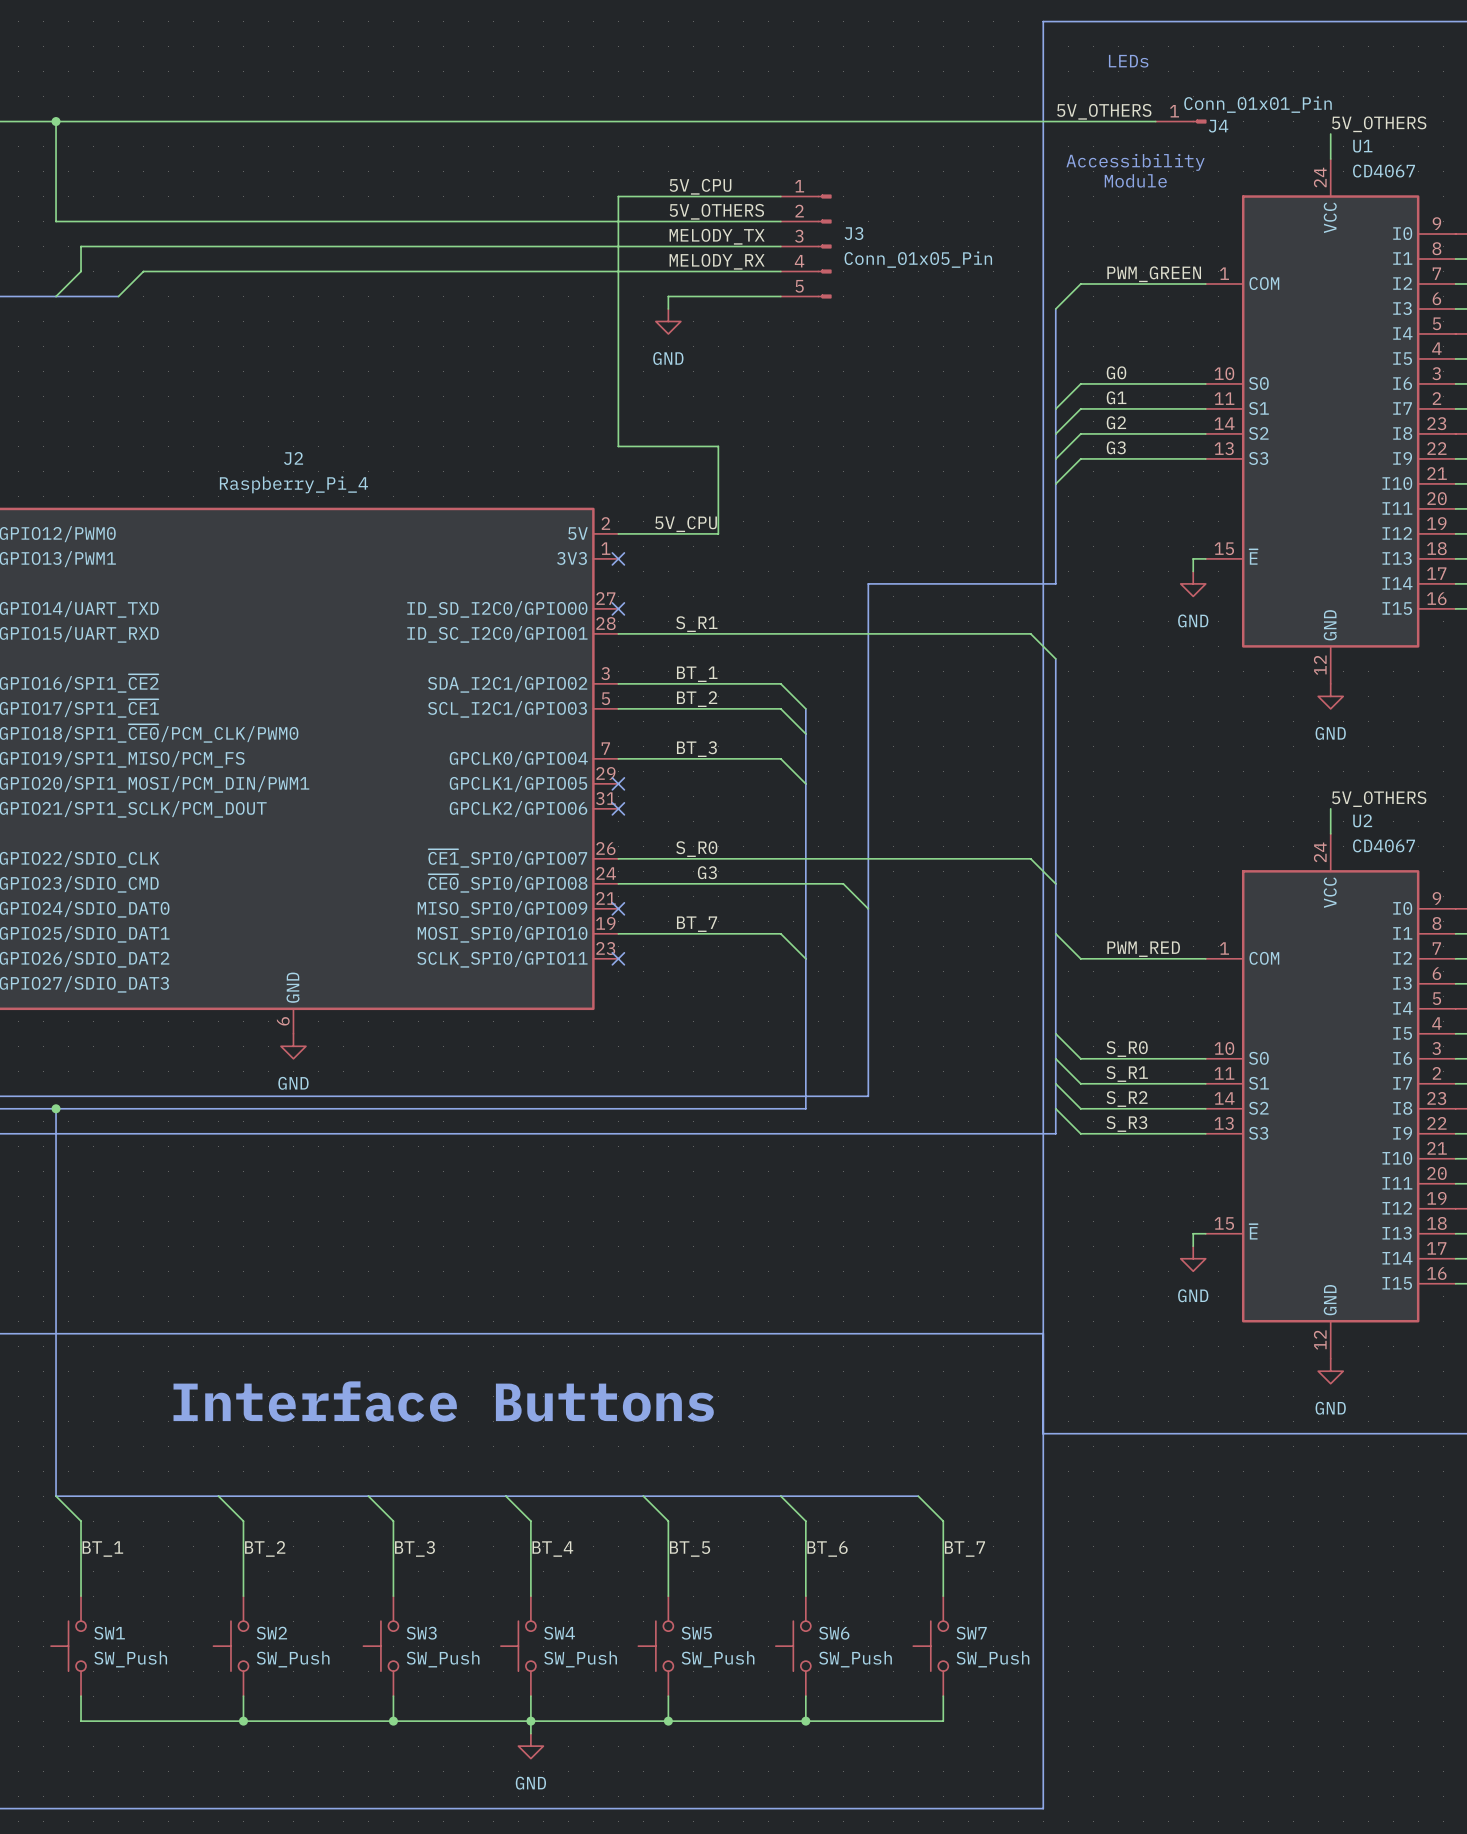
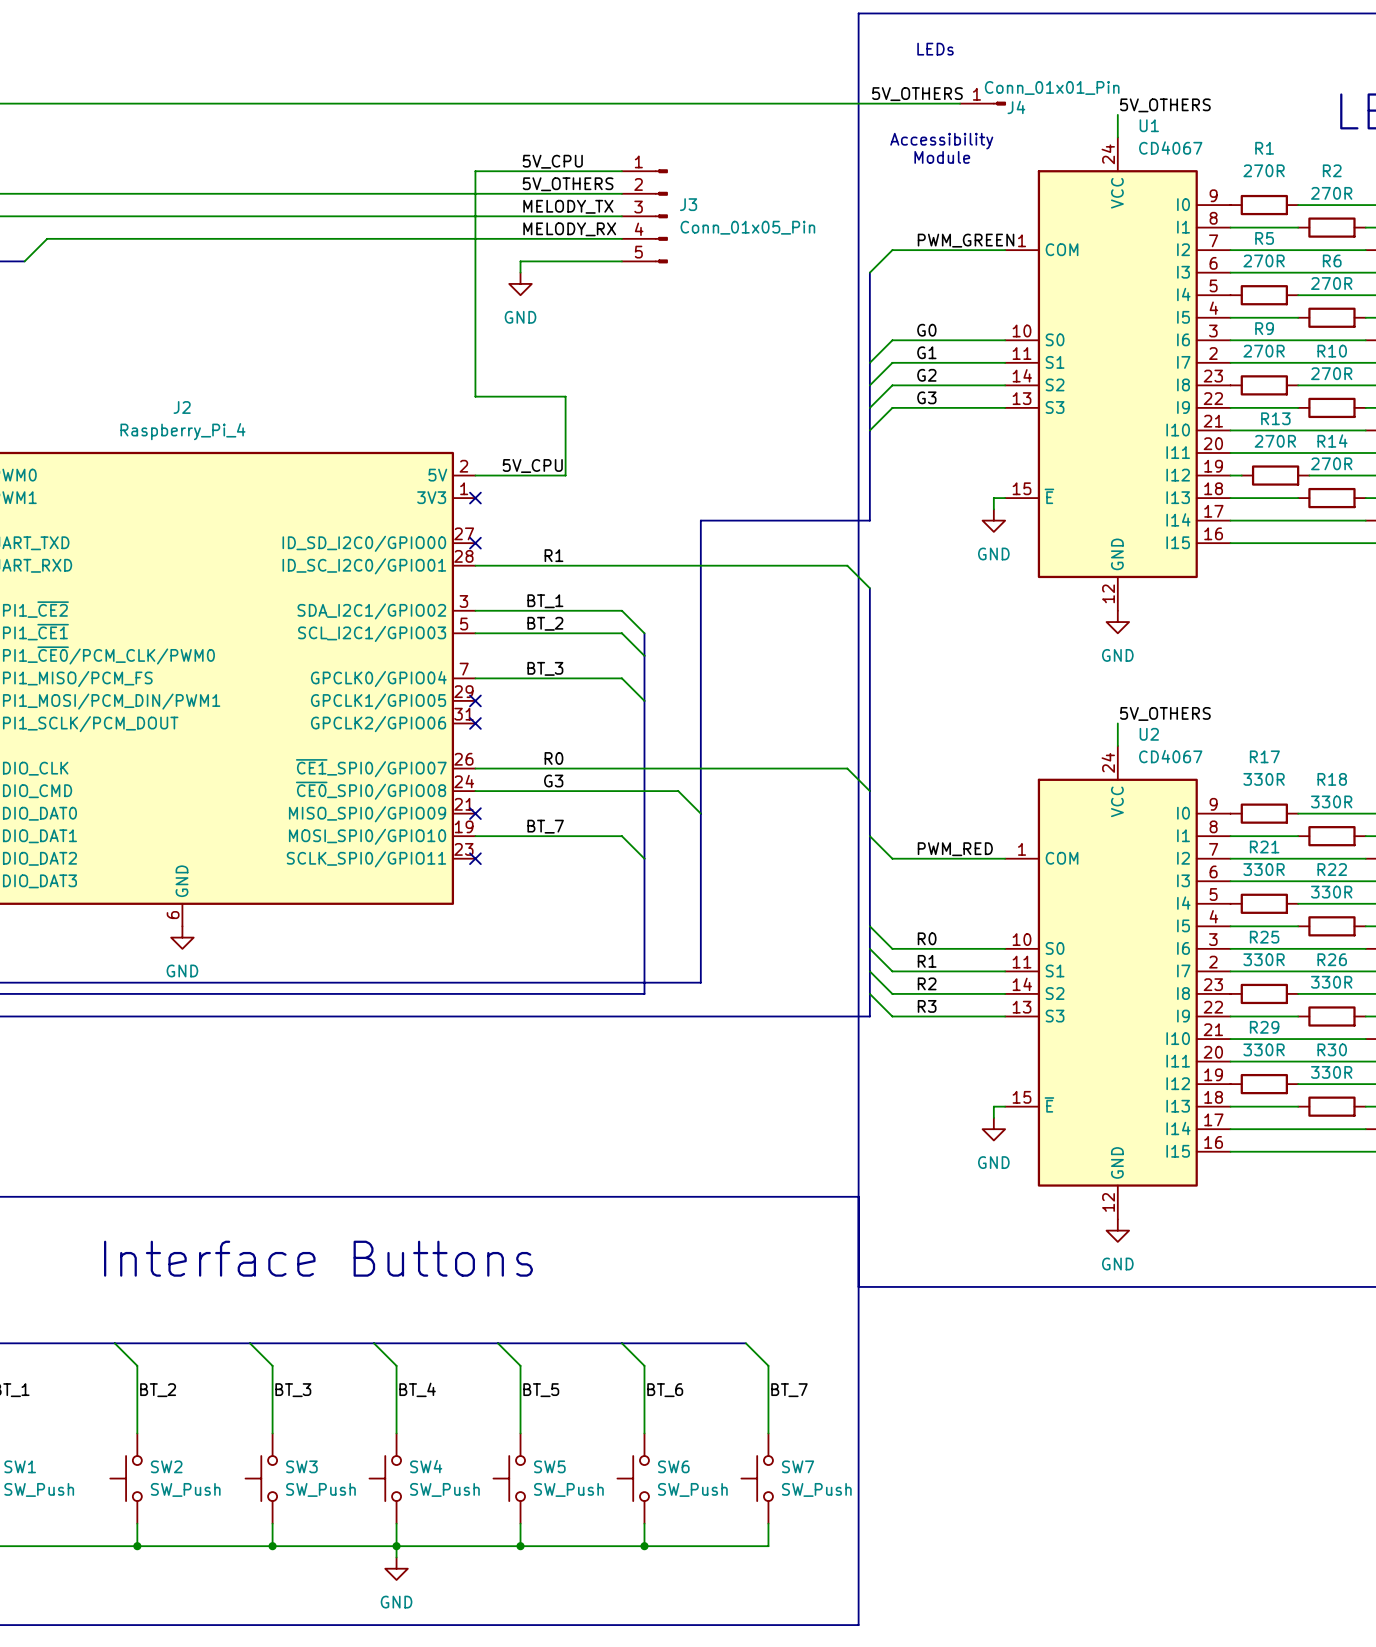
label: S_R1 (696, 624) -> R1 (553, 555)
label: S_R0 (696, 849) -> R0 (553, 758)
label: S_R0 (1127, 1049) -> R0 (927, 938)
label: S_R1 (1127, 1074) -> R1 (927, 961)
label: S_R2 (1127, 1099) -> R2 (927, 983)
label: S_R3 (1126, 1124) -> R3 (927, 1006)

